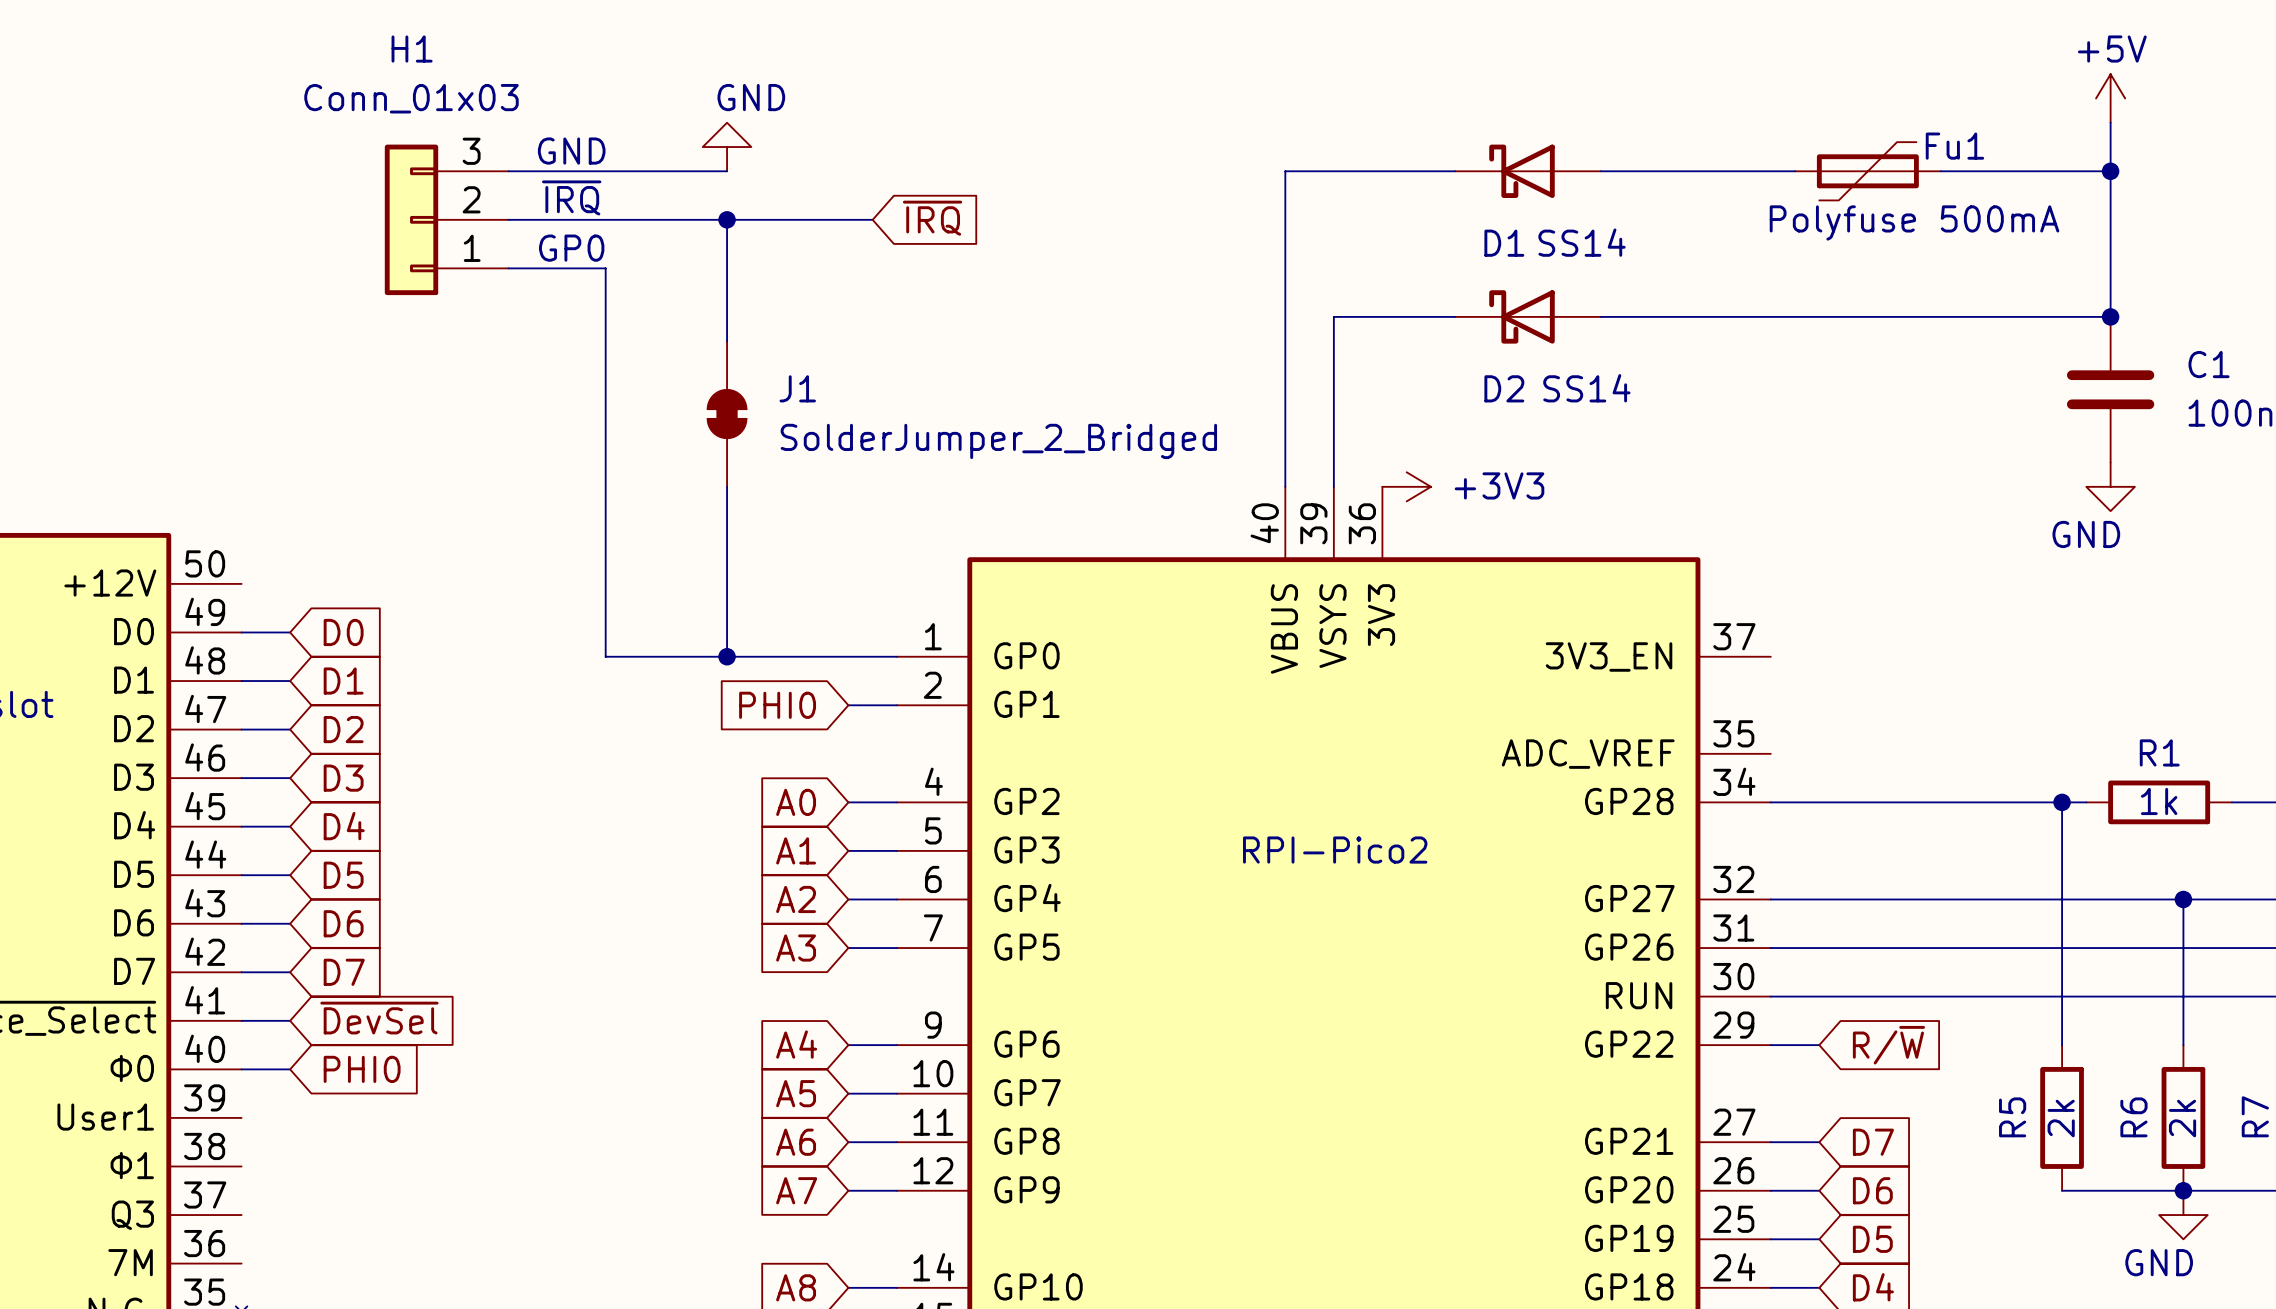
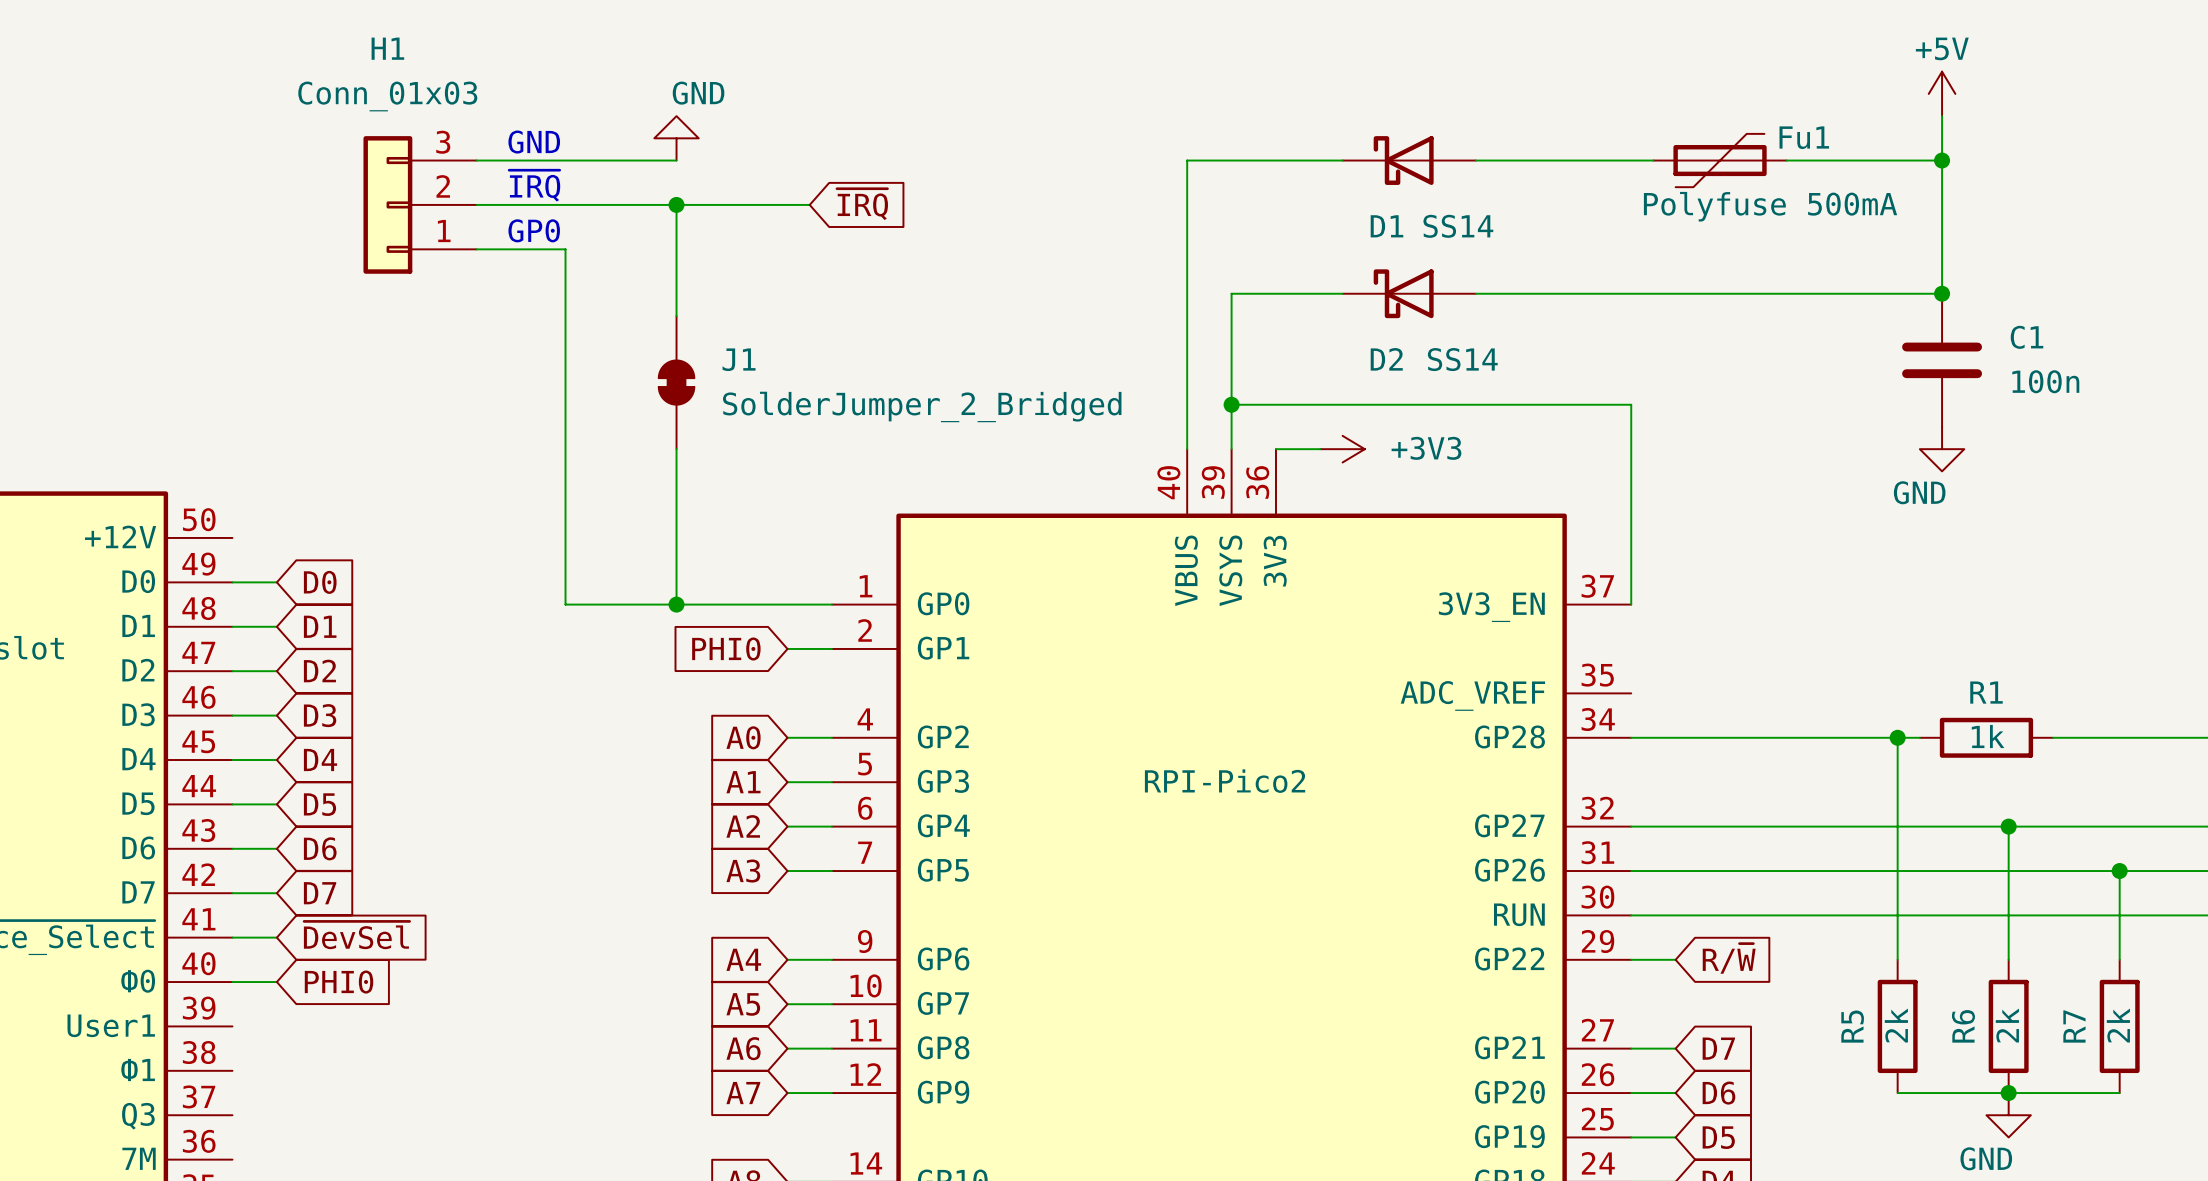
wire: none -> (1231, 404) (1631, 404) (1631, 604)
junction: none -> (1231, 404)
power symbol position: +3V3 (1406, 486) -> +3V3 (1342, 449)

